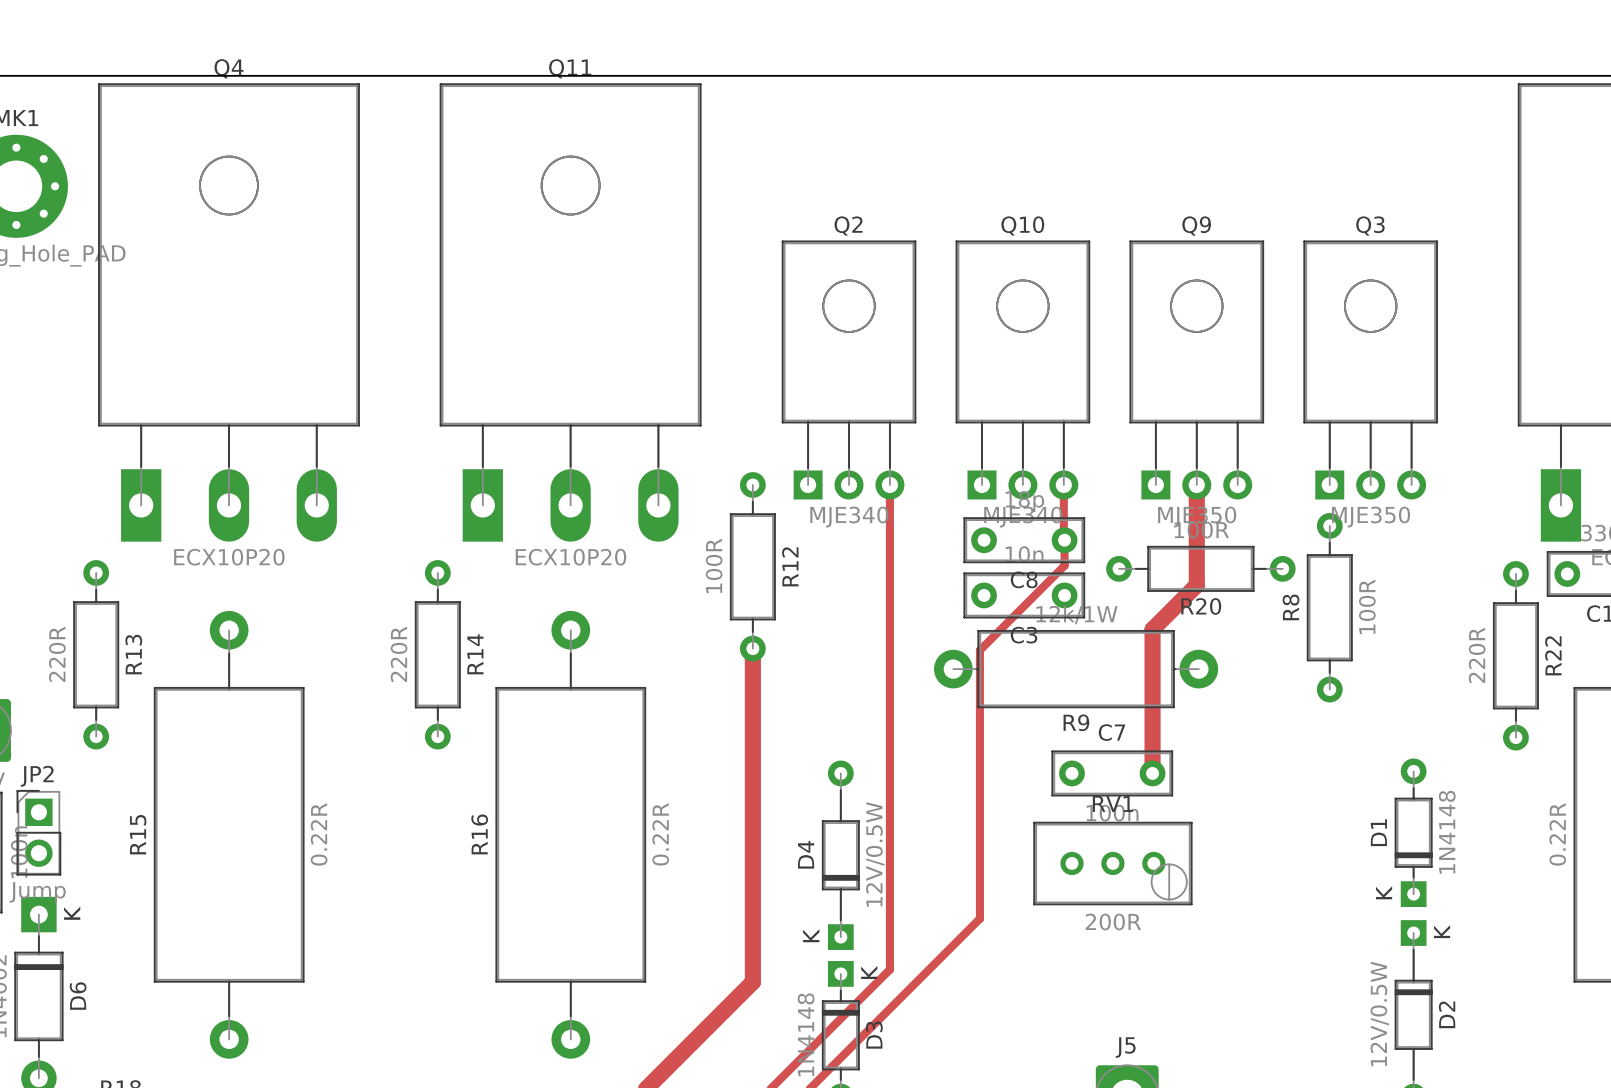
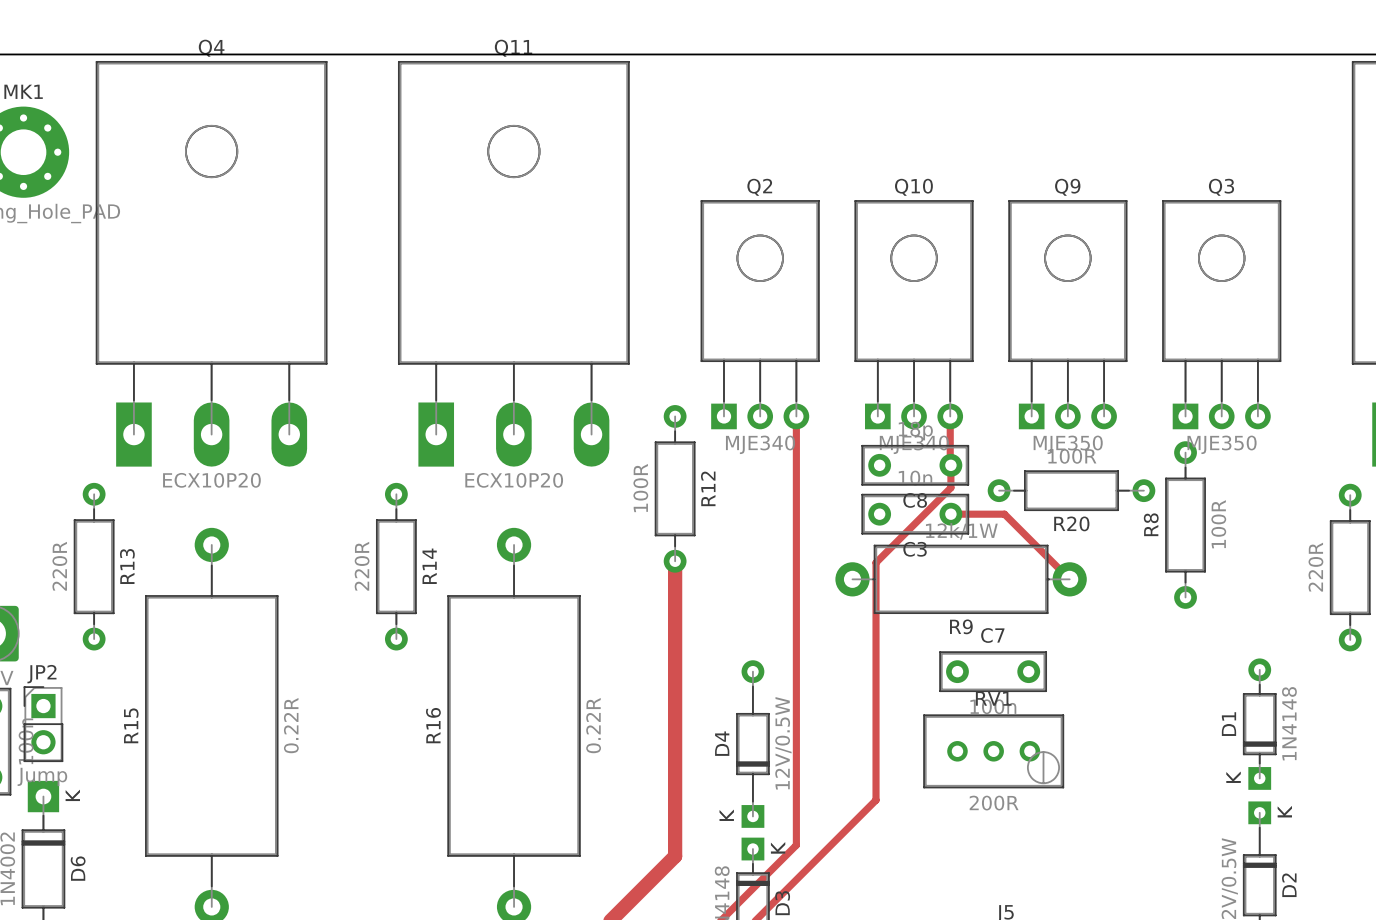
track: (1196, 484) (1196, 585) (1152, 629) (1152, 773) -> none
track: none -> (950, 514) (1004, 514) (1069, 579)

